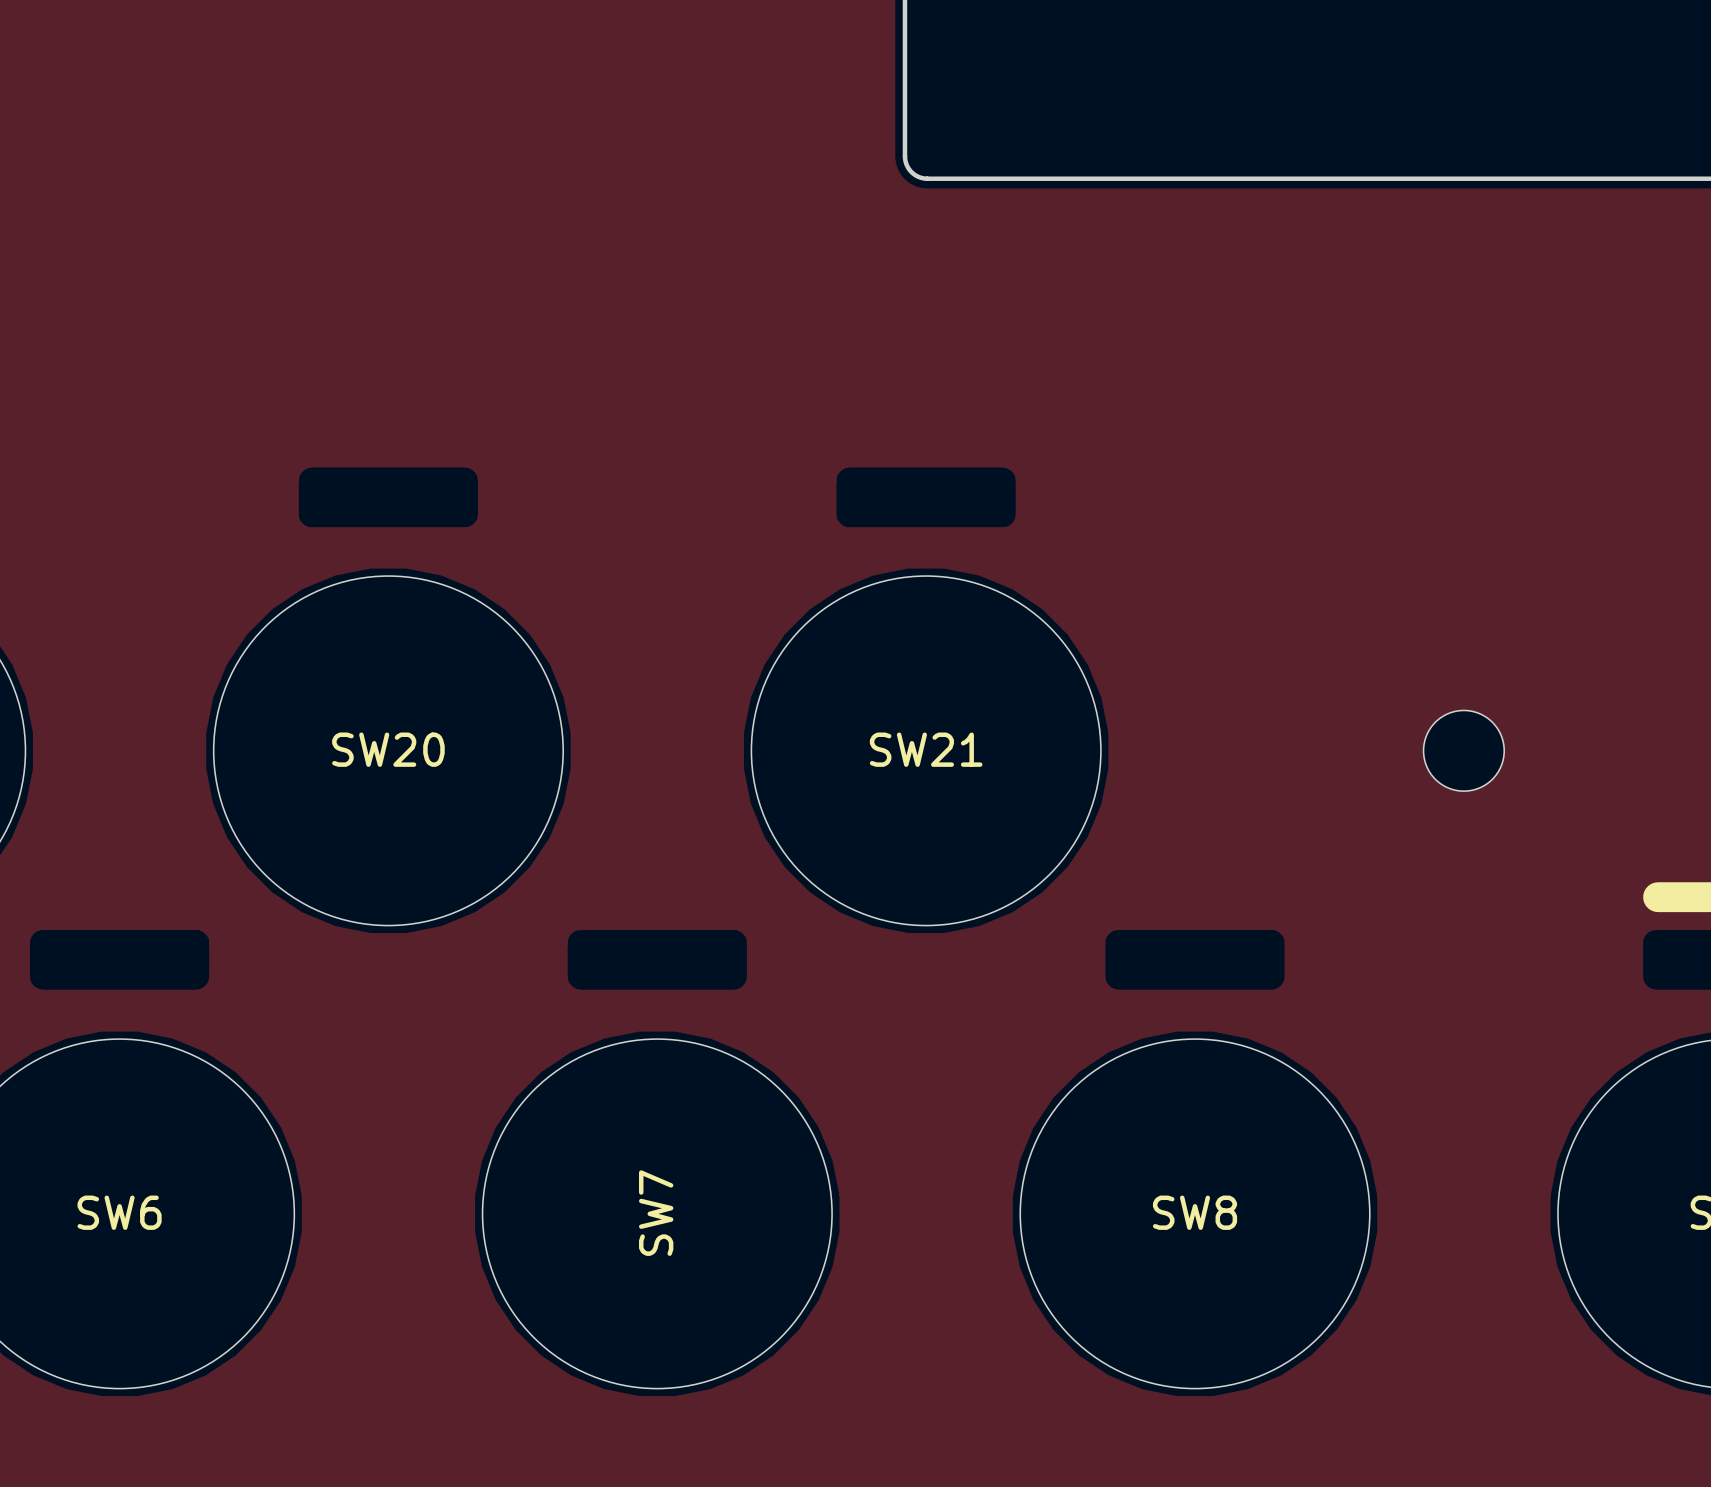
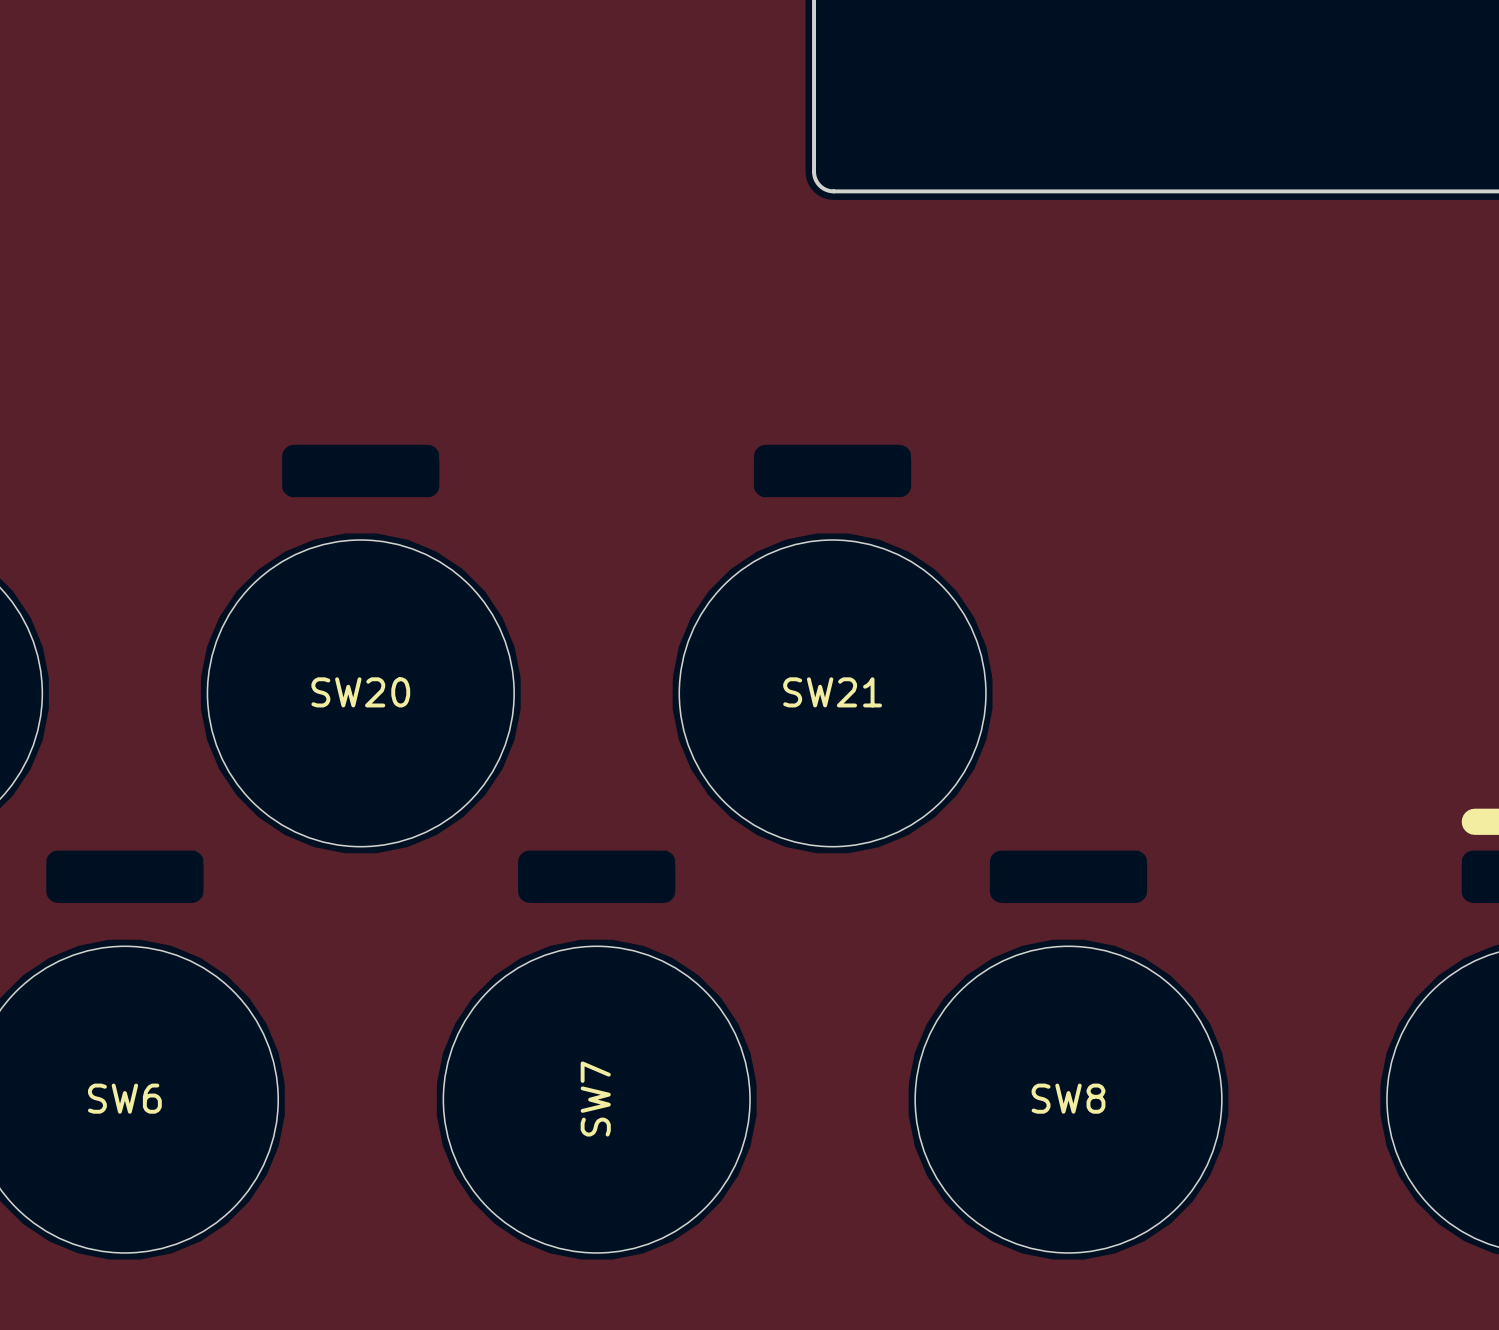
part: (1463, 750) -> none

